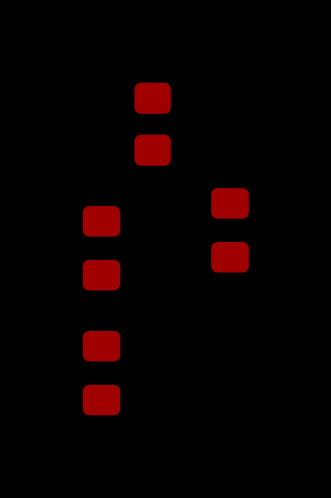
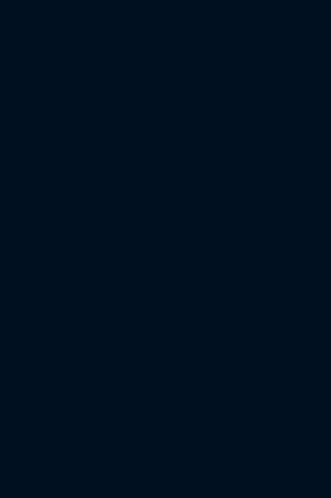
part: (152, 124) -> none
part: (229, 230) -> none
part: (101, 248) -> none
part: (101, 373) -> none

